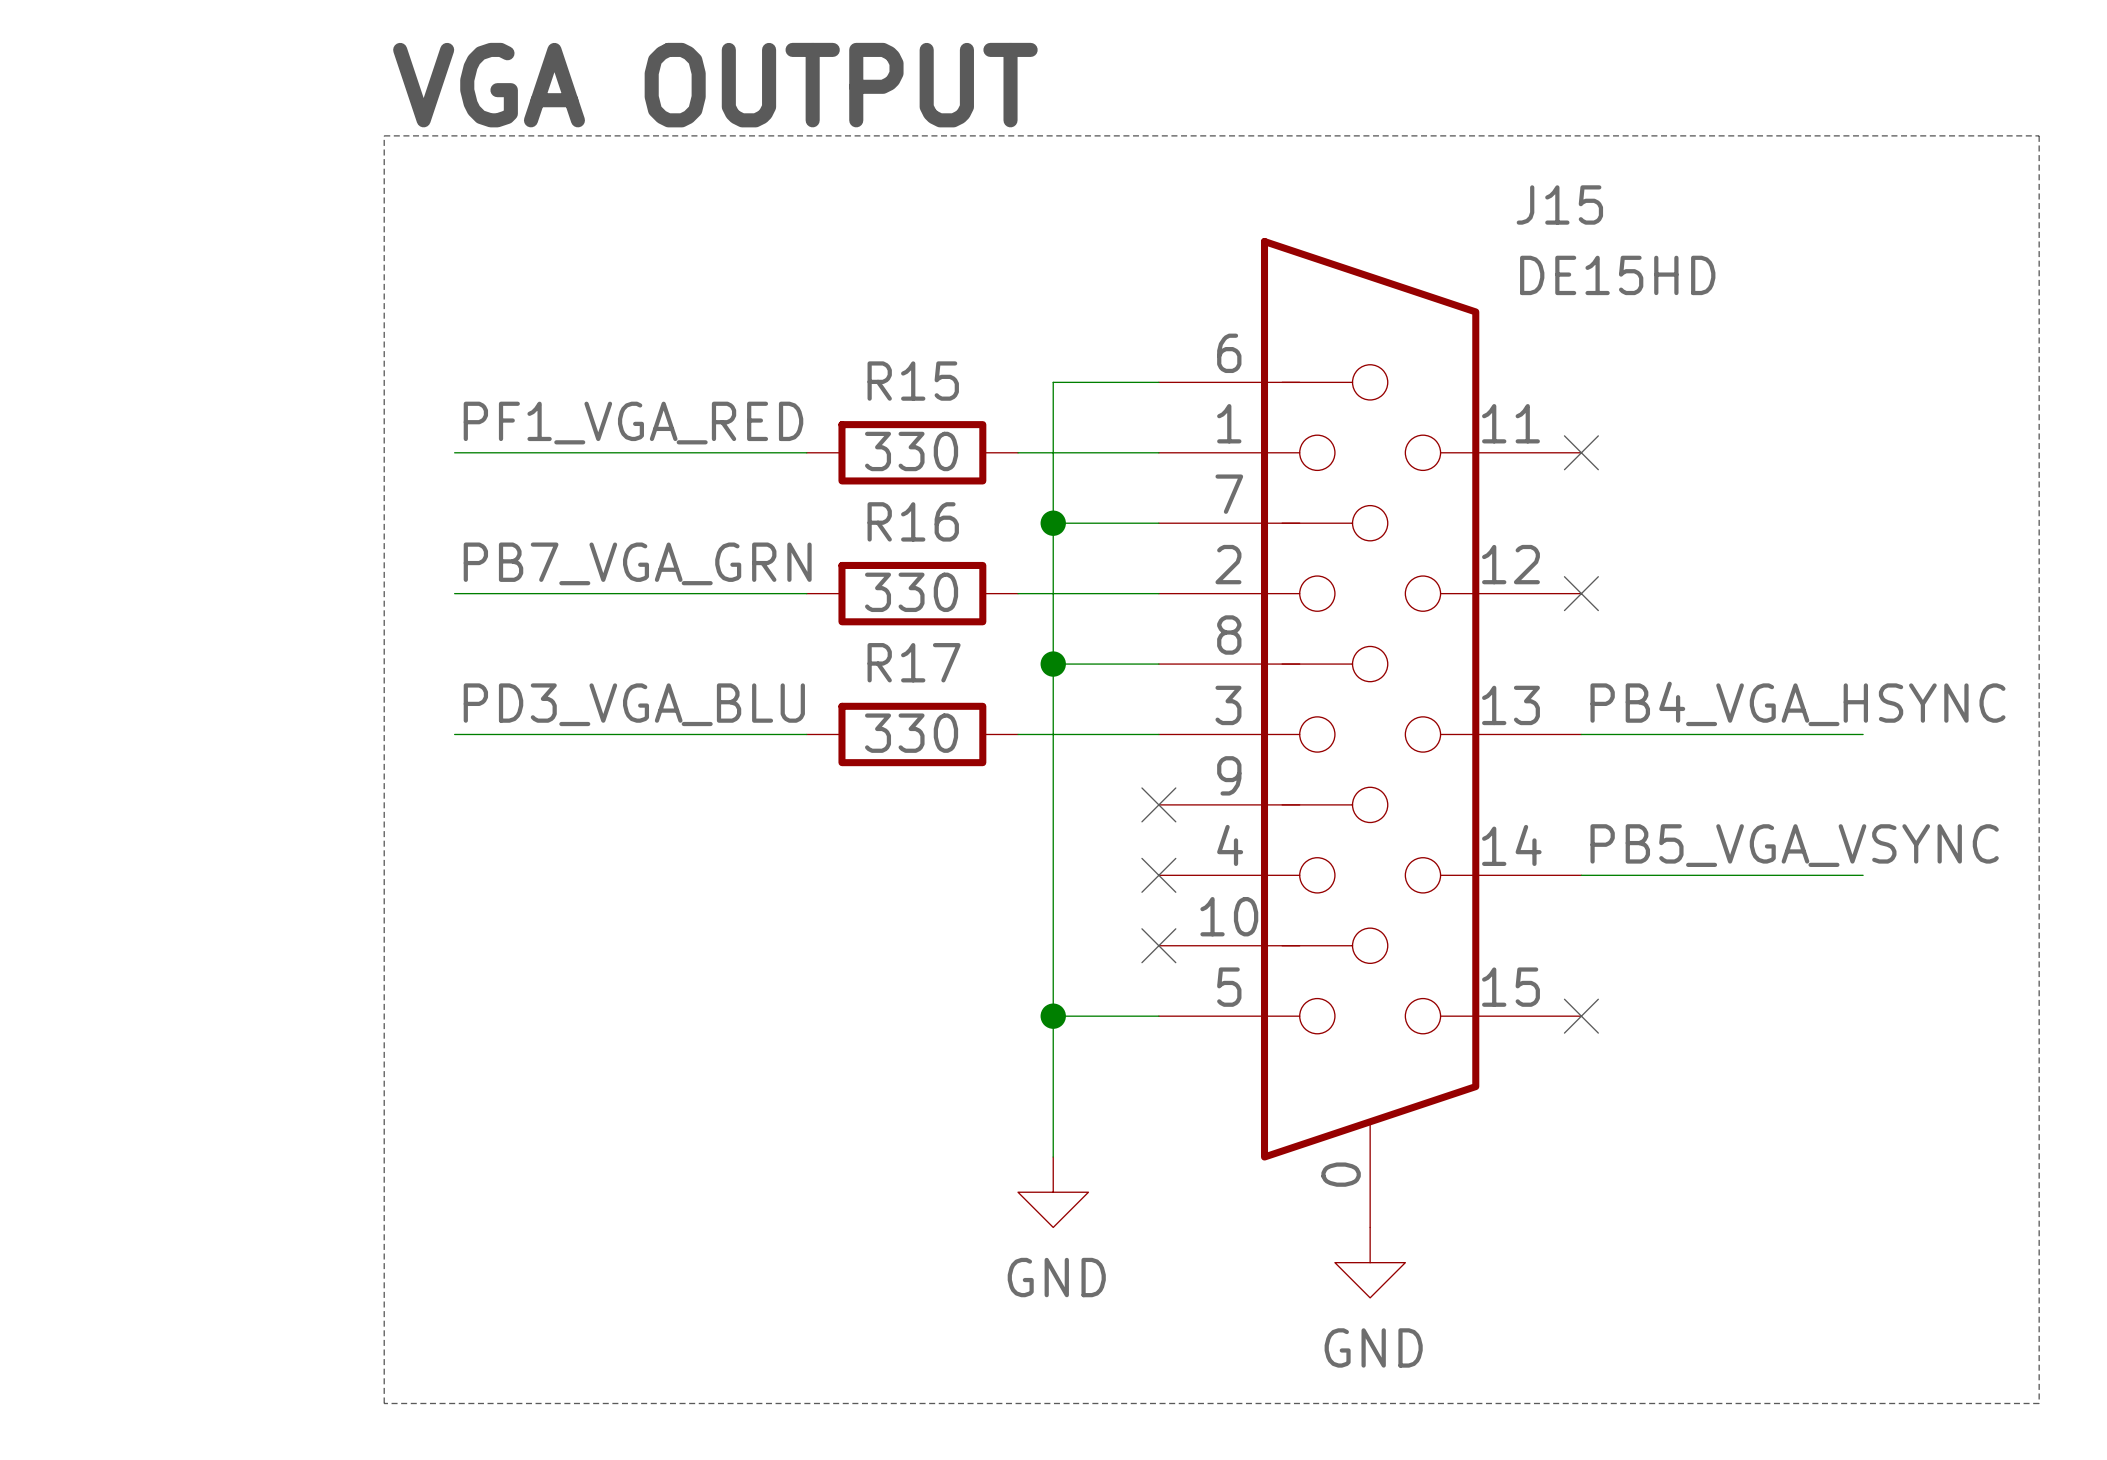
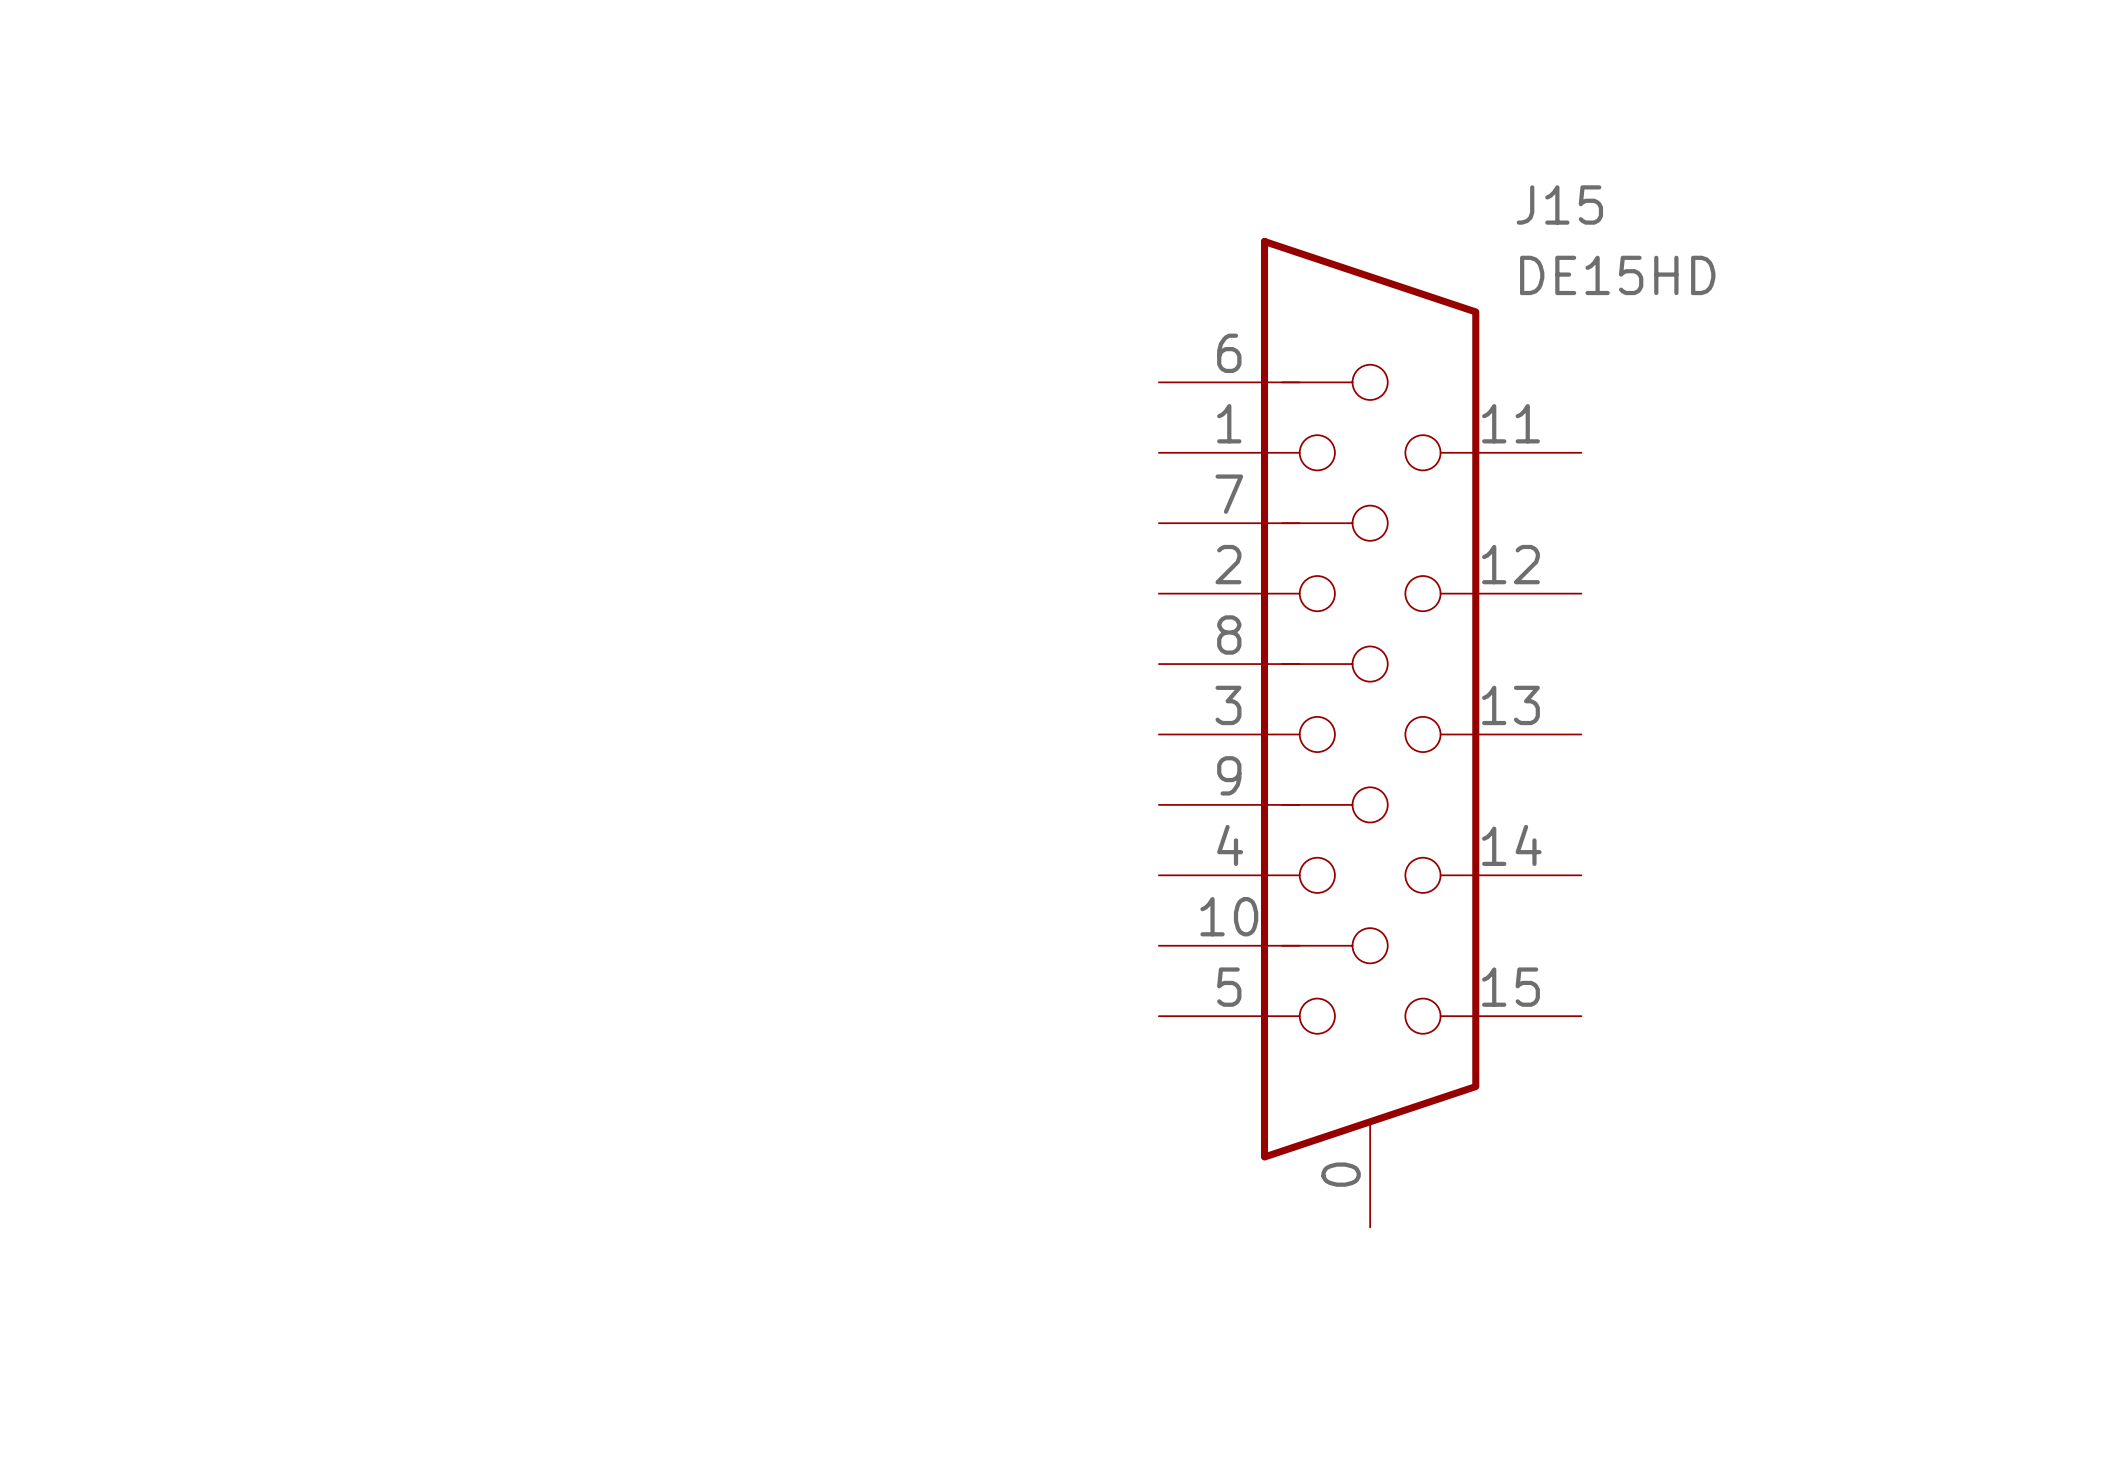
text: VGA OUTPUT (715, 85) -> none
line: (384, 135) (384, 1403) (2039, 1403) (2039, 135) (384, 135) -> none
wire: (1158, 382) (1053, 382) (1053, 1157) -> none
label: PF1_VGA_RED (633, 423) -> none
wire: (454, 452) (806, 452) -> none
R15: 330 (912, 452) -> none
wire: (1018, 452) (1158, 452) -> none
no-connect mark: (1581, 452) -> none
wire: (1053, 523) (1158, 523) -> none
junction: (1053, 523) -> none
label: PB7_VGA_GRN (637, 563) -> none
wire: (454, 593) (806, 593) -> none
R16: 330 (912, 593) -> none
wire: (1018, 593) (1158, 593) -> none
no-connect mark: (1581, 593) -> none
wire: (1053, 664) (1158, 664) -> none
junction: (1053, 664) -> none
label: PB4_VGA_HSYNC (1797, 703) -> none
label: PD3_VGA_BLU (634, 704) -> none
wire: (454, 734) (806, 734) -> none
R17: 330 (912, 734) -> none
wire: (1018, 734) (1158, 734) -> none
wire: (1581, 734) (1863, 734) -> none
no-connect mark: (1158, 804) -> none
label: PB5_VGA_VSYNC (1794, 845) -> none
no-connect mark: (1158, 875) -> none
wire: (1581, 875) (1863, 875) -> none
no-connect mark: (1158, 945) -> none
wire: (1053, 1016) (1158, 1016) -> none
junction: (1053, 1016) -> none
no-connect mark: (1581, 1016) -> none
power symbol: GND (1053, 1192) -> none
power symbol: GND (1370, 1262) -> none

